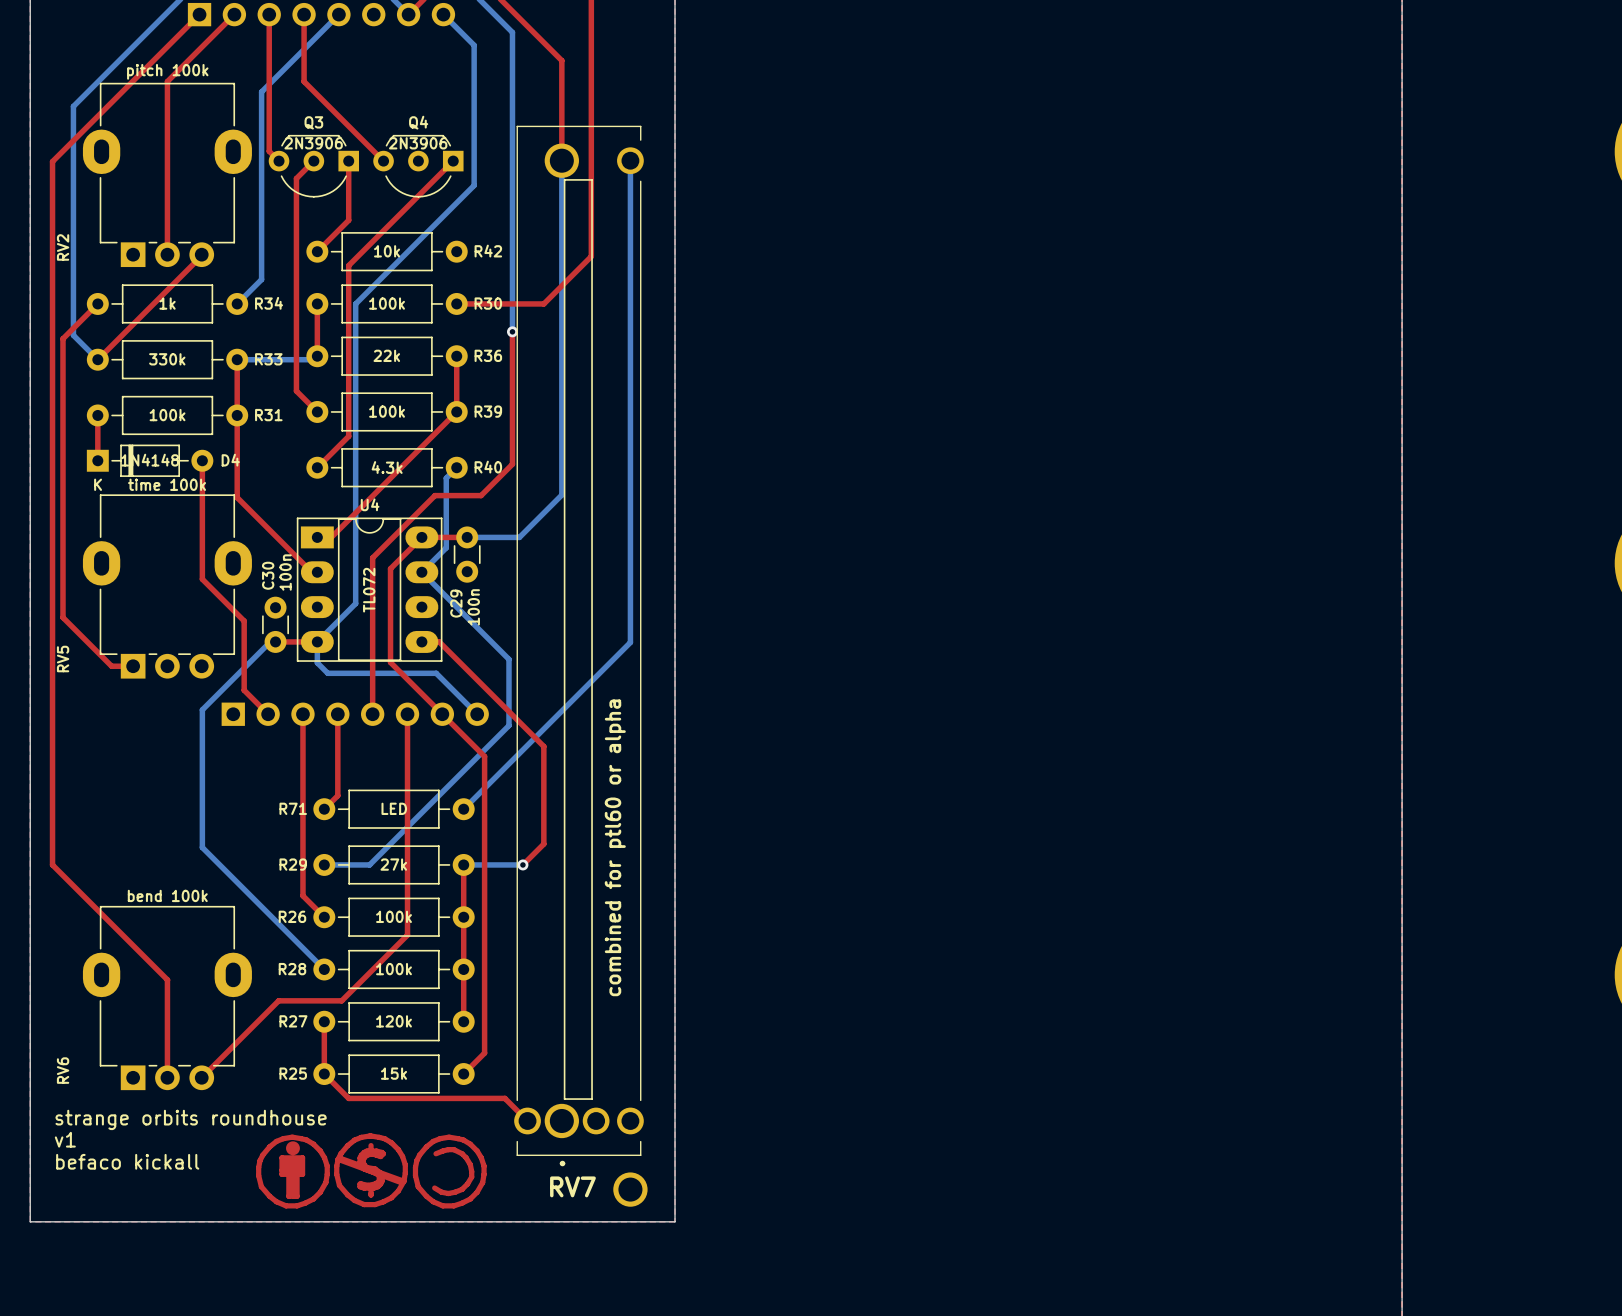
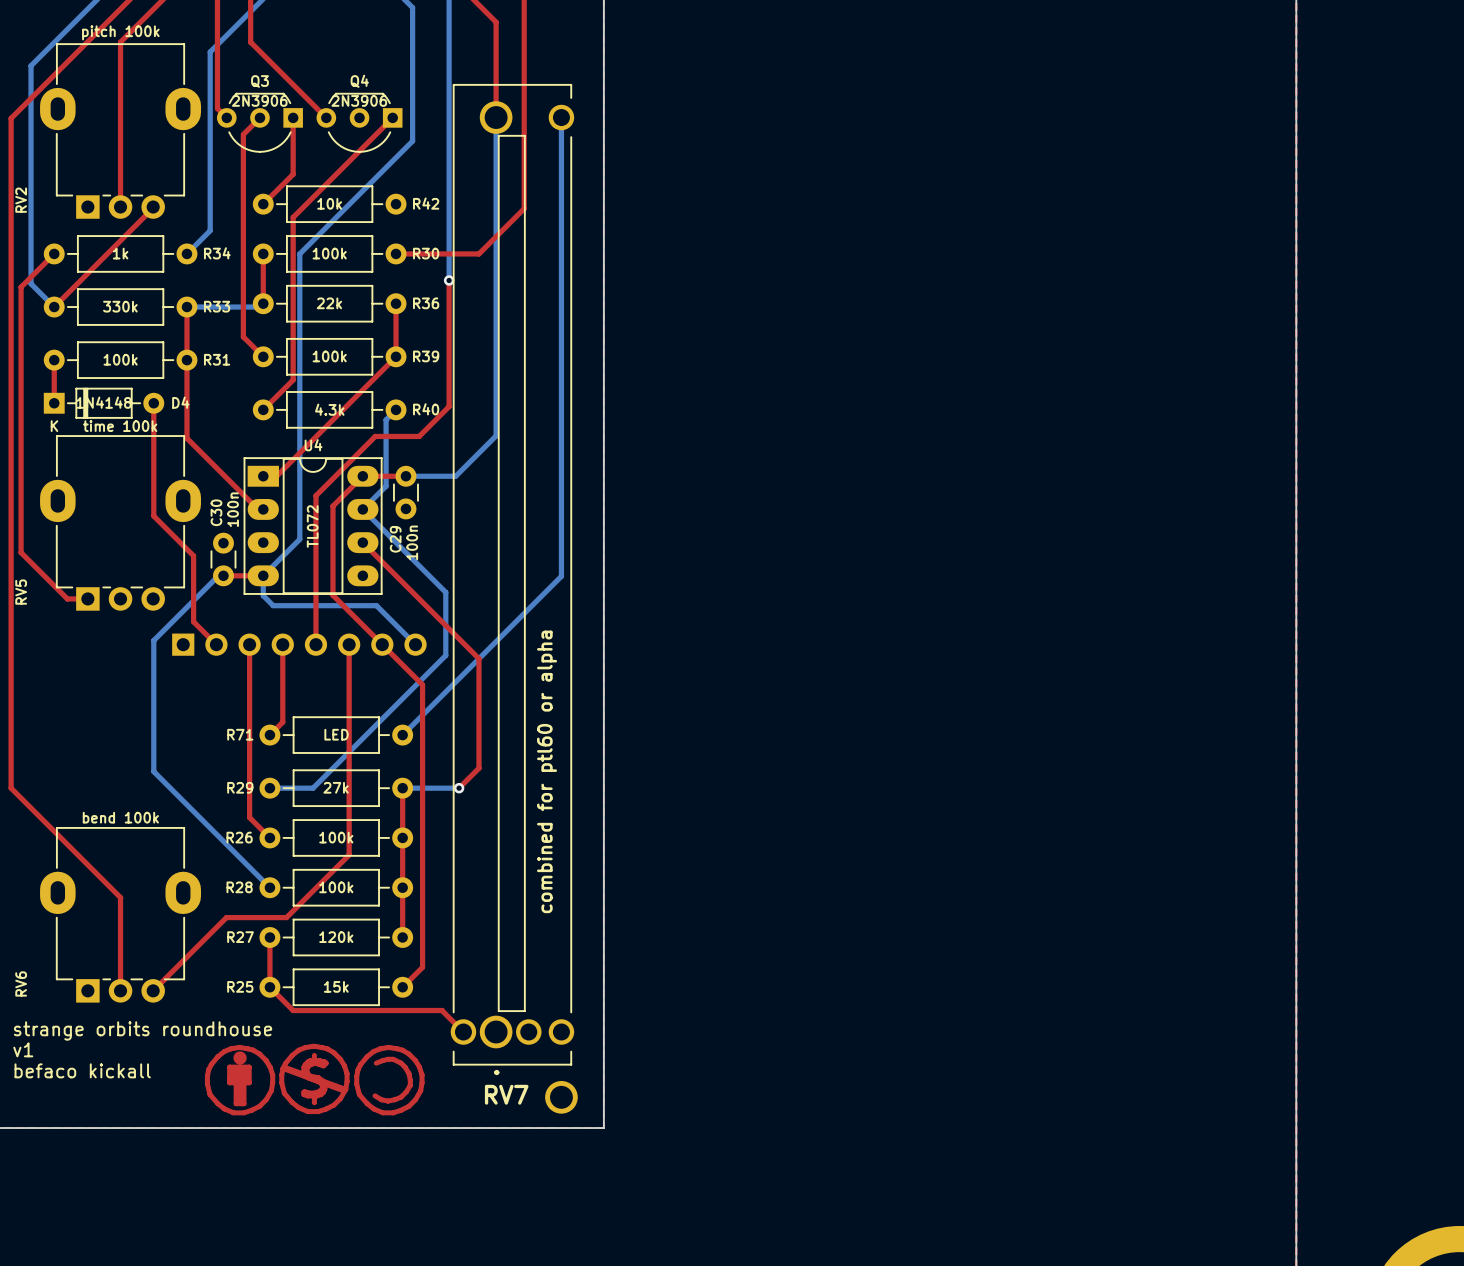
top track: (421, 641) (439, 641) (543, 746) -> (362, 542) (478, 658) (478, 675)

